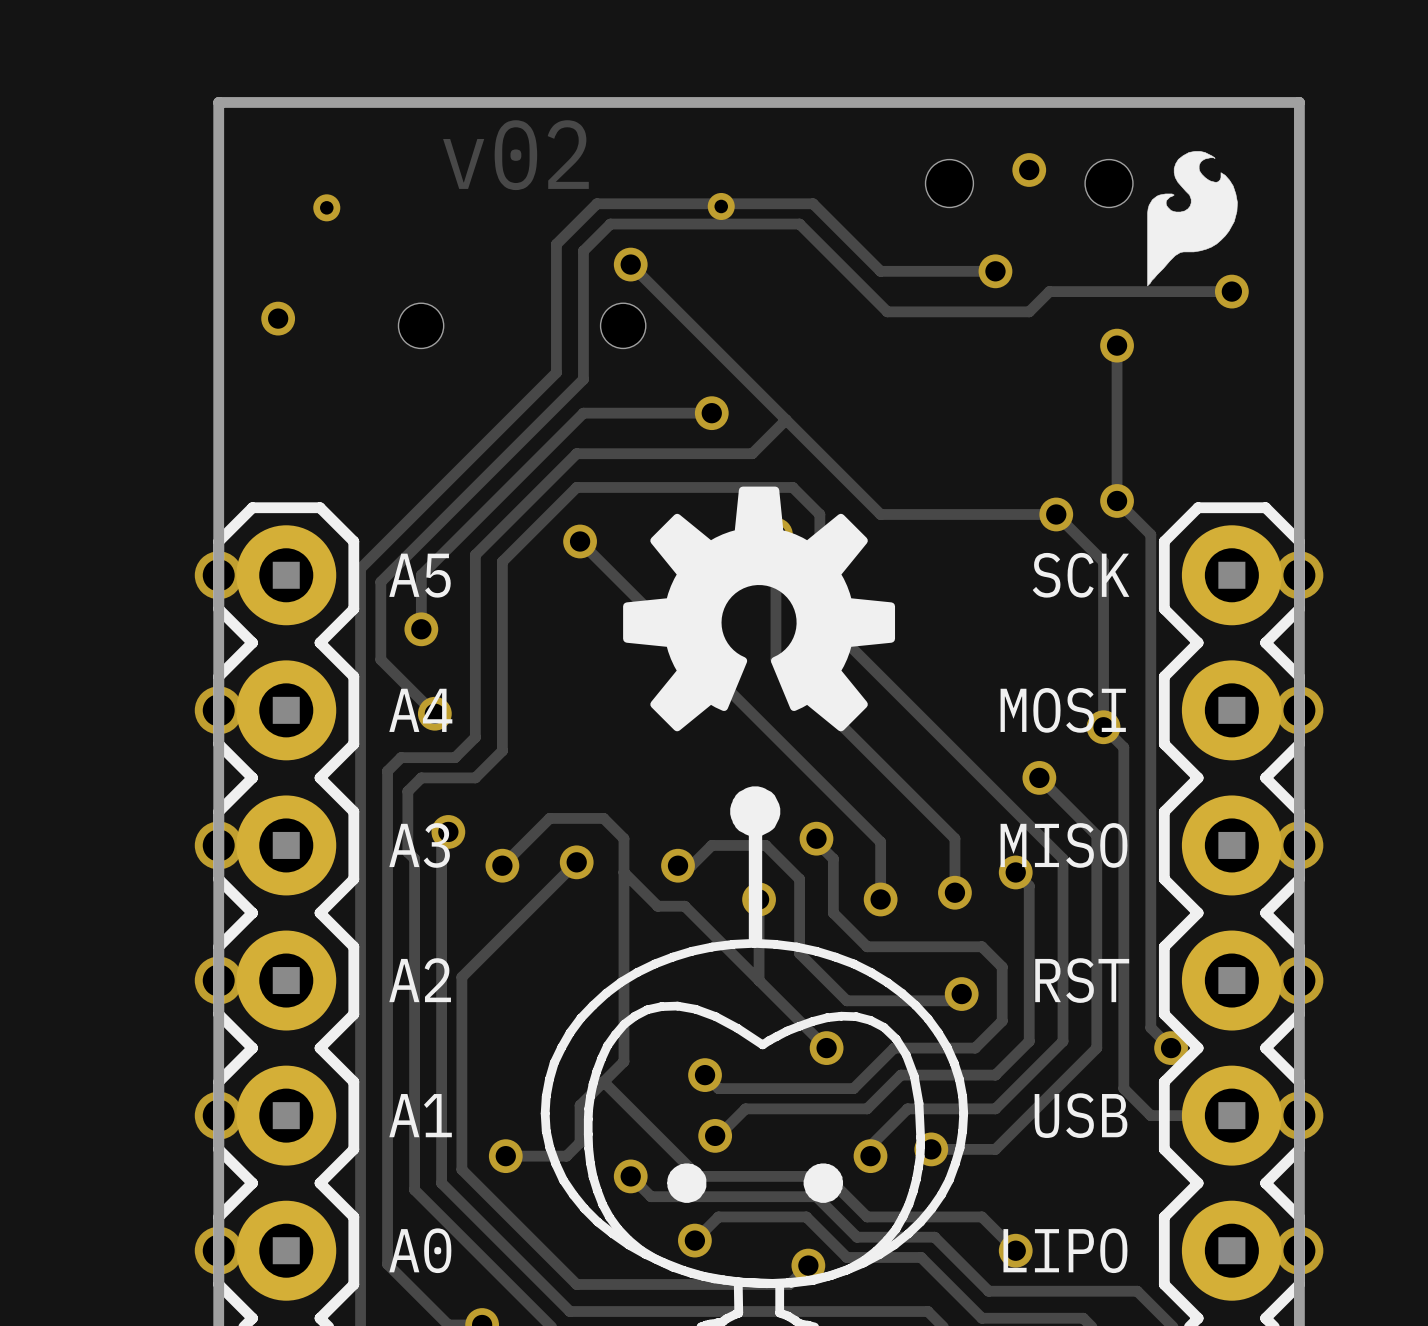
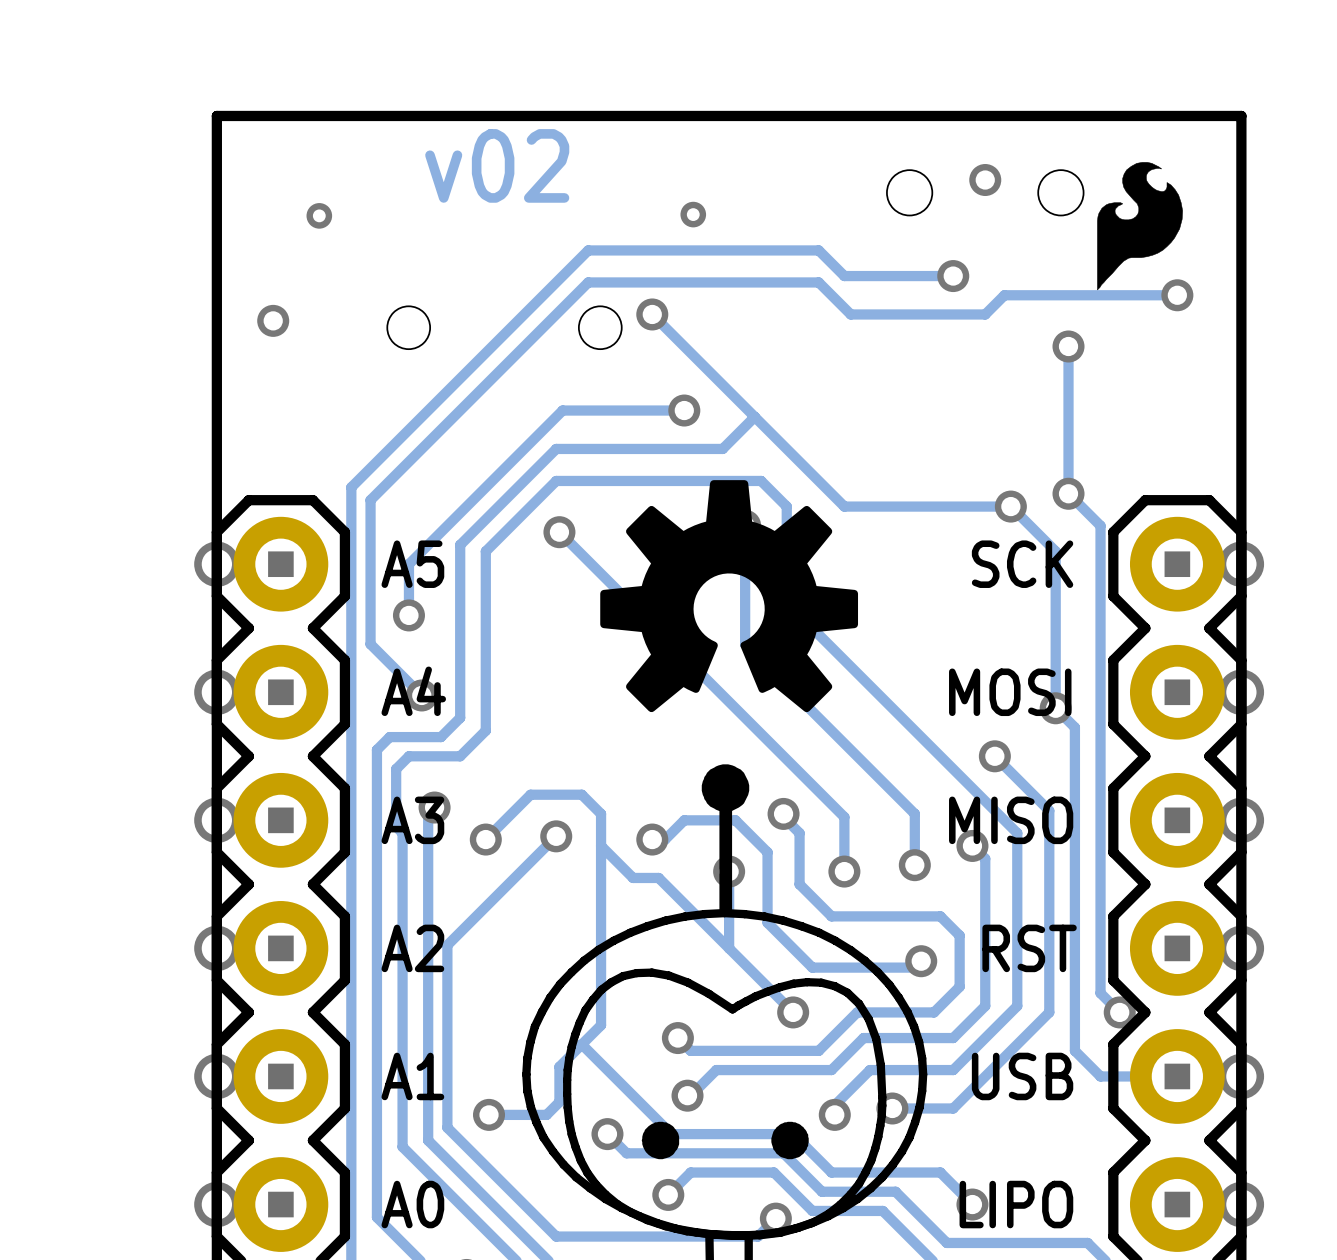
track: (853, 244) (813, 203) (596, 203) (556, 244) (556, 372) (360, 568) -> (818, 250) (588, 250) (351, 487) (351, 557)
track: (630, 264) (678, 311) -> none
via position: (630, 264) -> (652, 314)
track: (853, 278) (799, 224) (610, 224) (583, 251) (583, 379) (380, 582) -> (818, 282) (588, 282) (370, 500) (370, 570)

